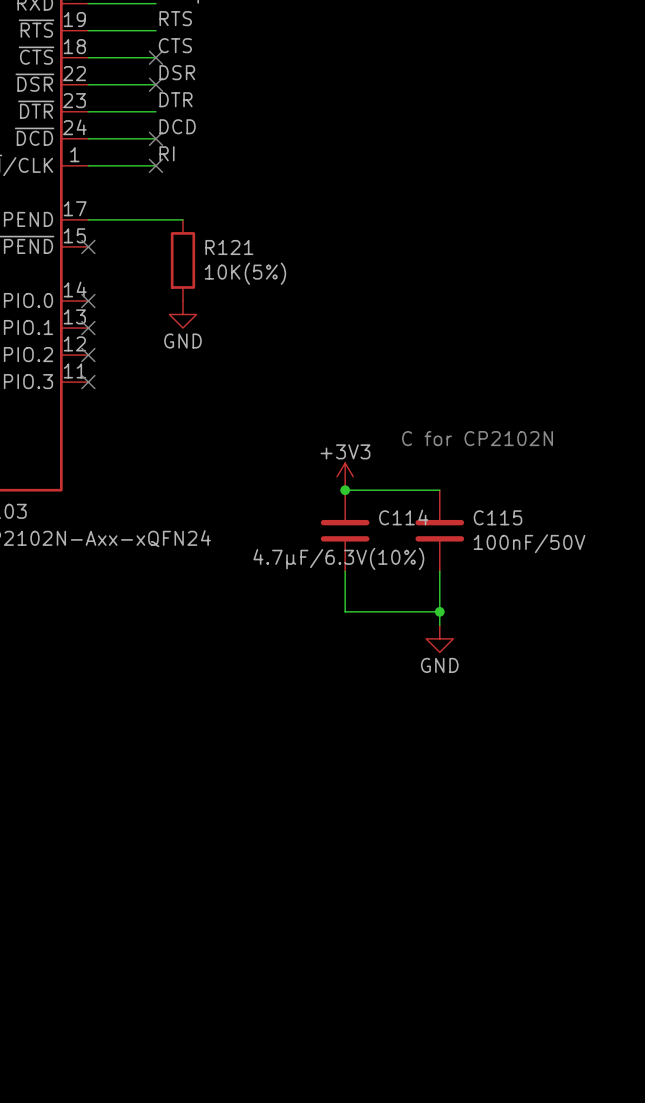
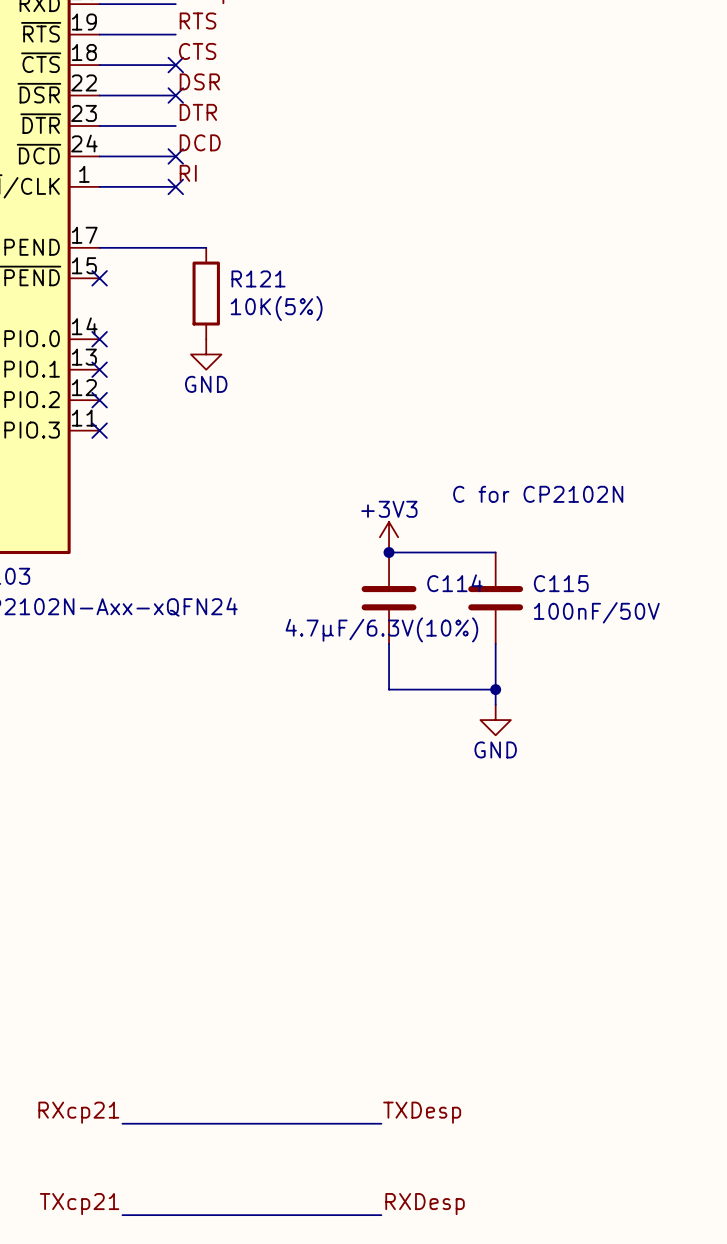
label: none -> RXcp21 (78, 1112)
label: none -> TXDesp (422, 1112)
wire: none -> (122, 1123) (381, 1123)
label: none -> TXcp21 (79, 1204)
label: none -> RXDesp (425, 1204)
wire: none -> (122, 1215) (381, 1215)

